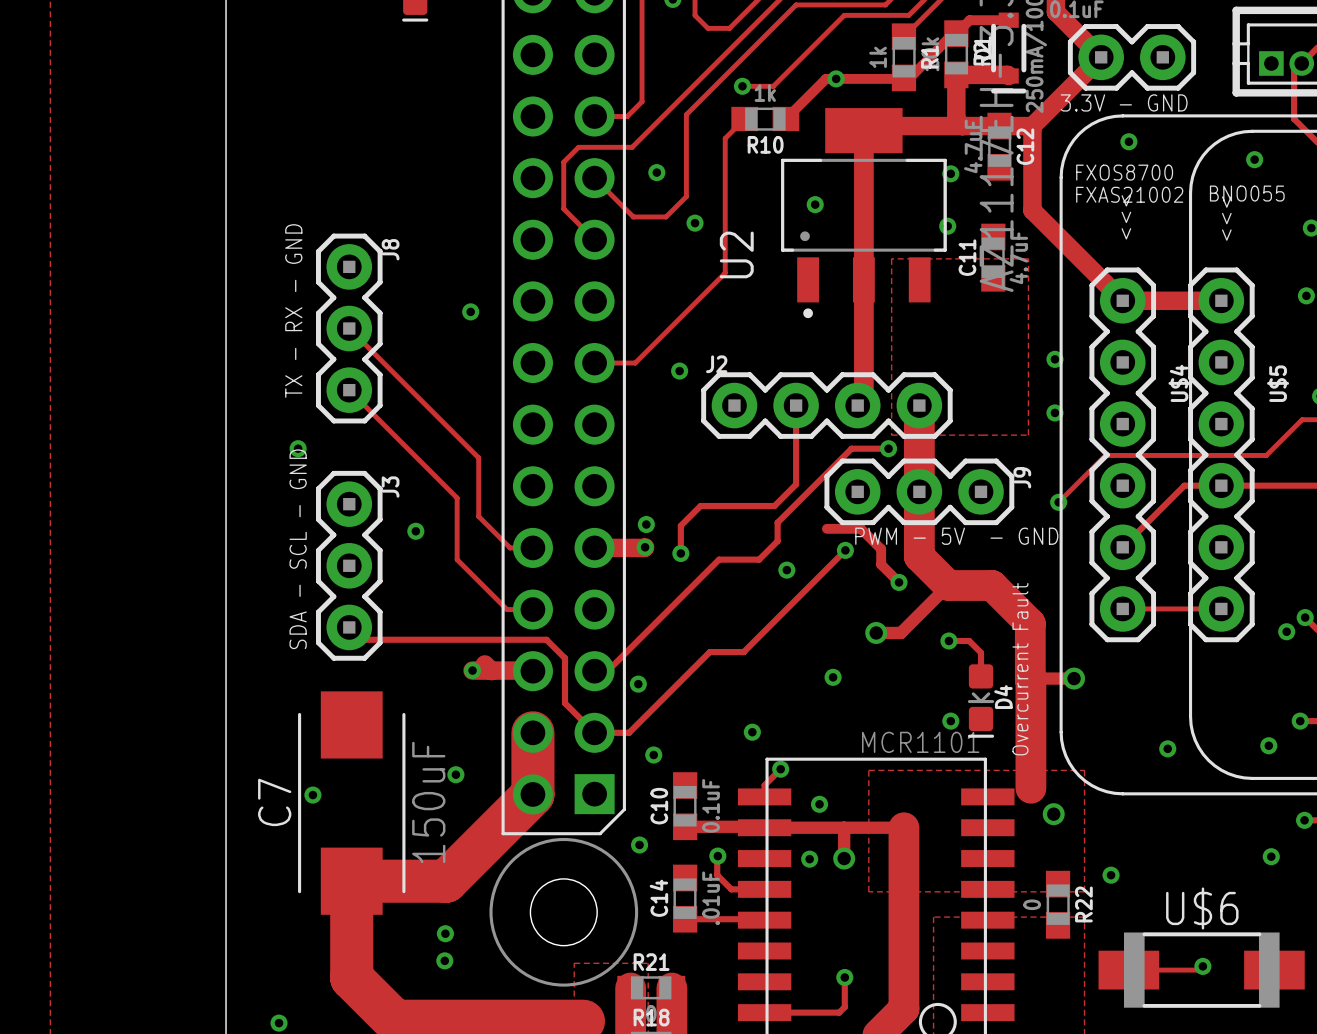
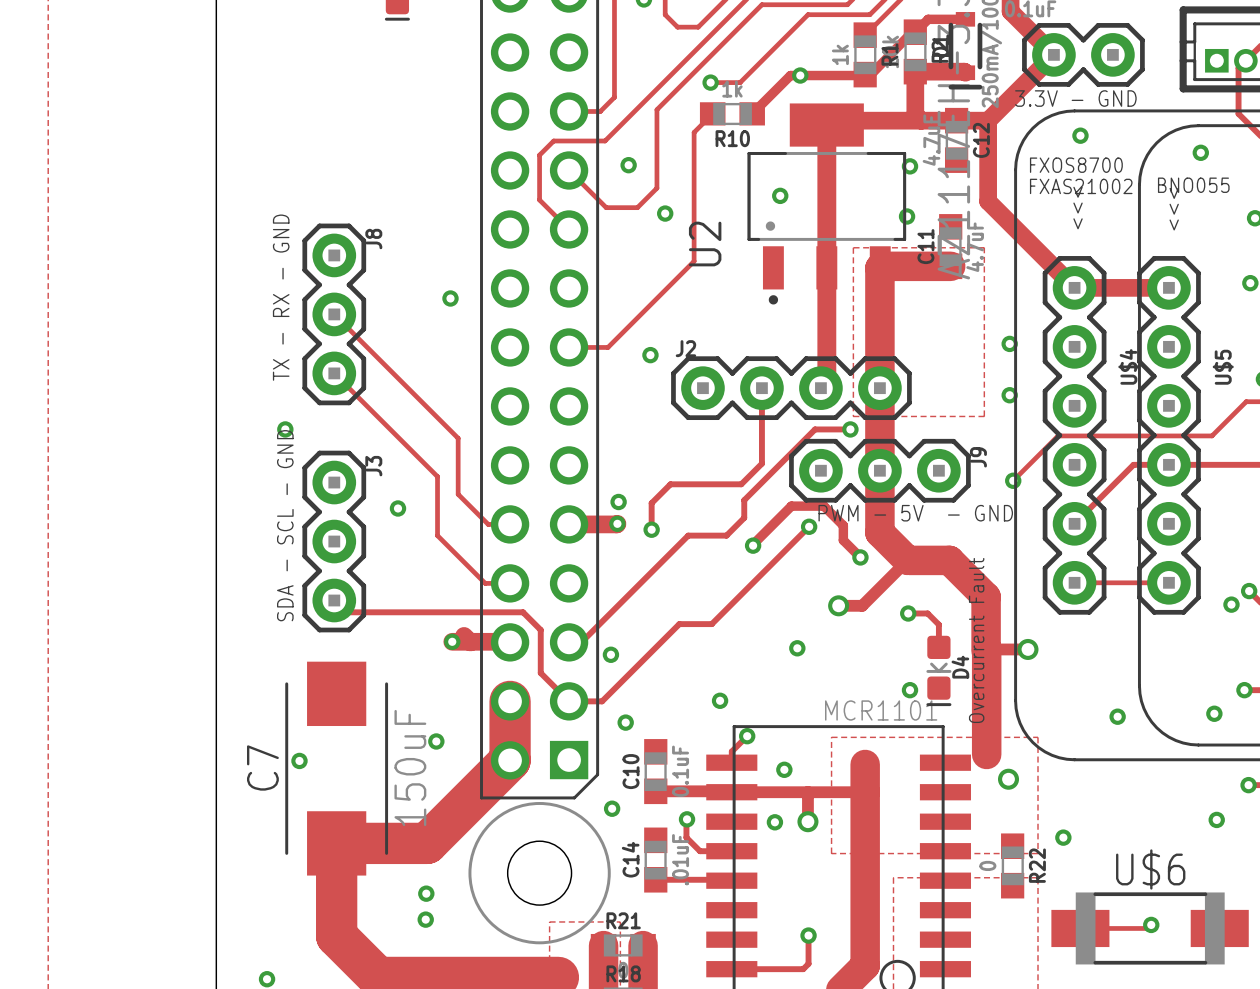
track: none -> (950, 266) (881, 266) (879, 268) (879, 388)
track: none -> (791, 506) (753, 543)
track: none -> (865, 764) (865, 792)

